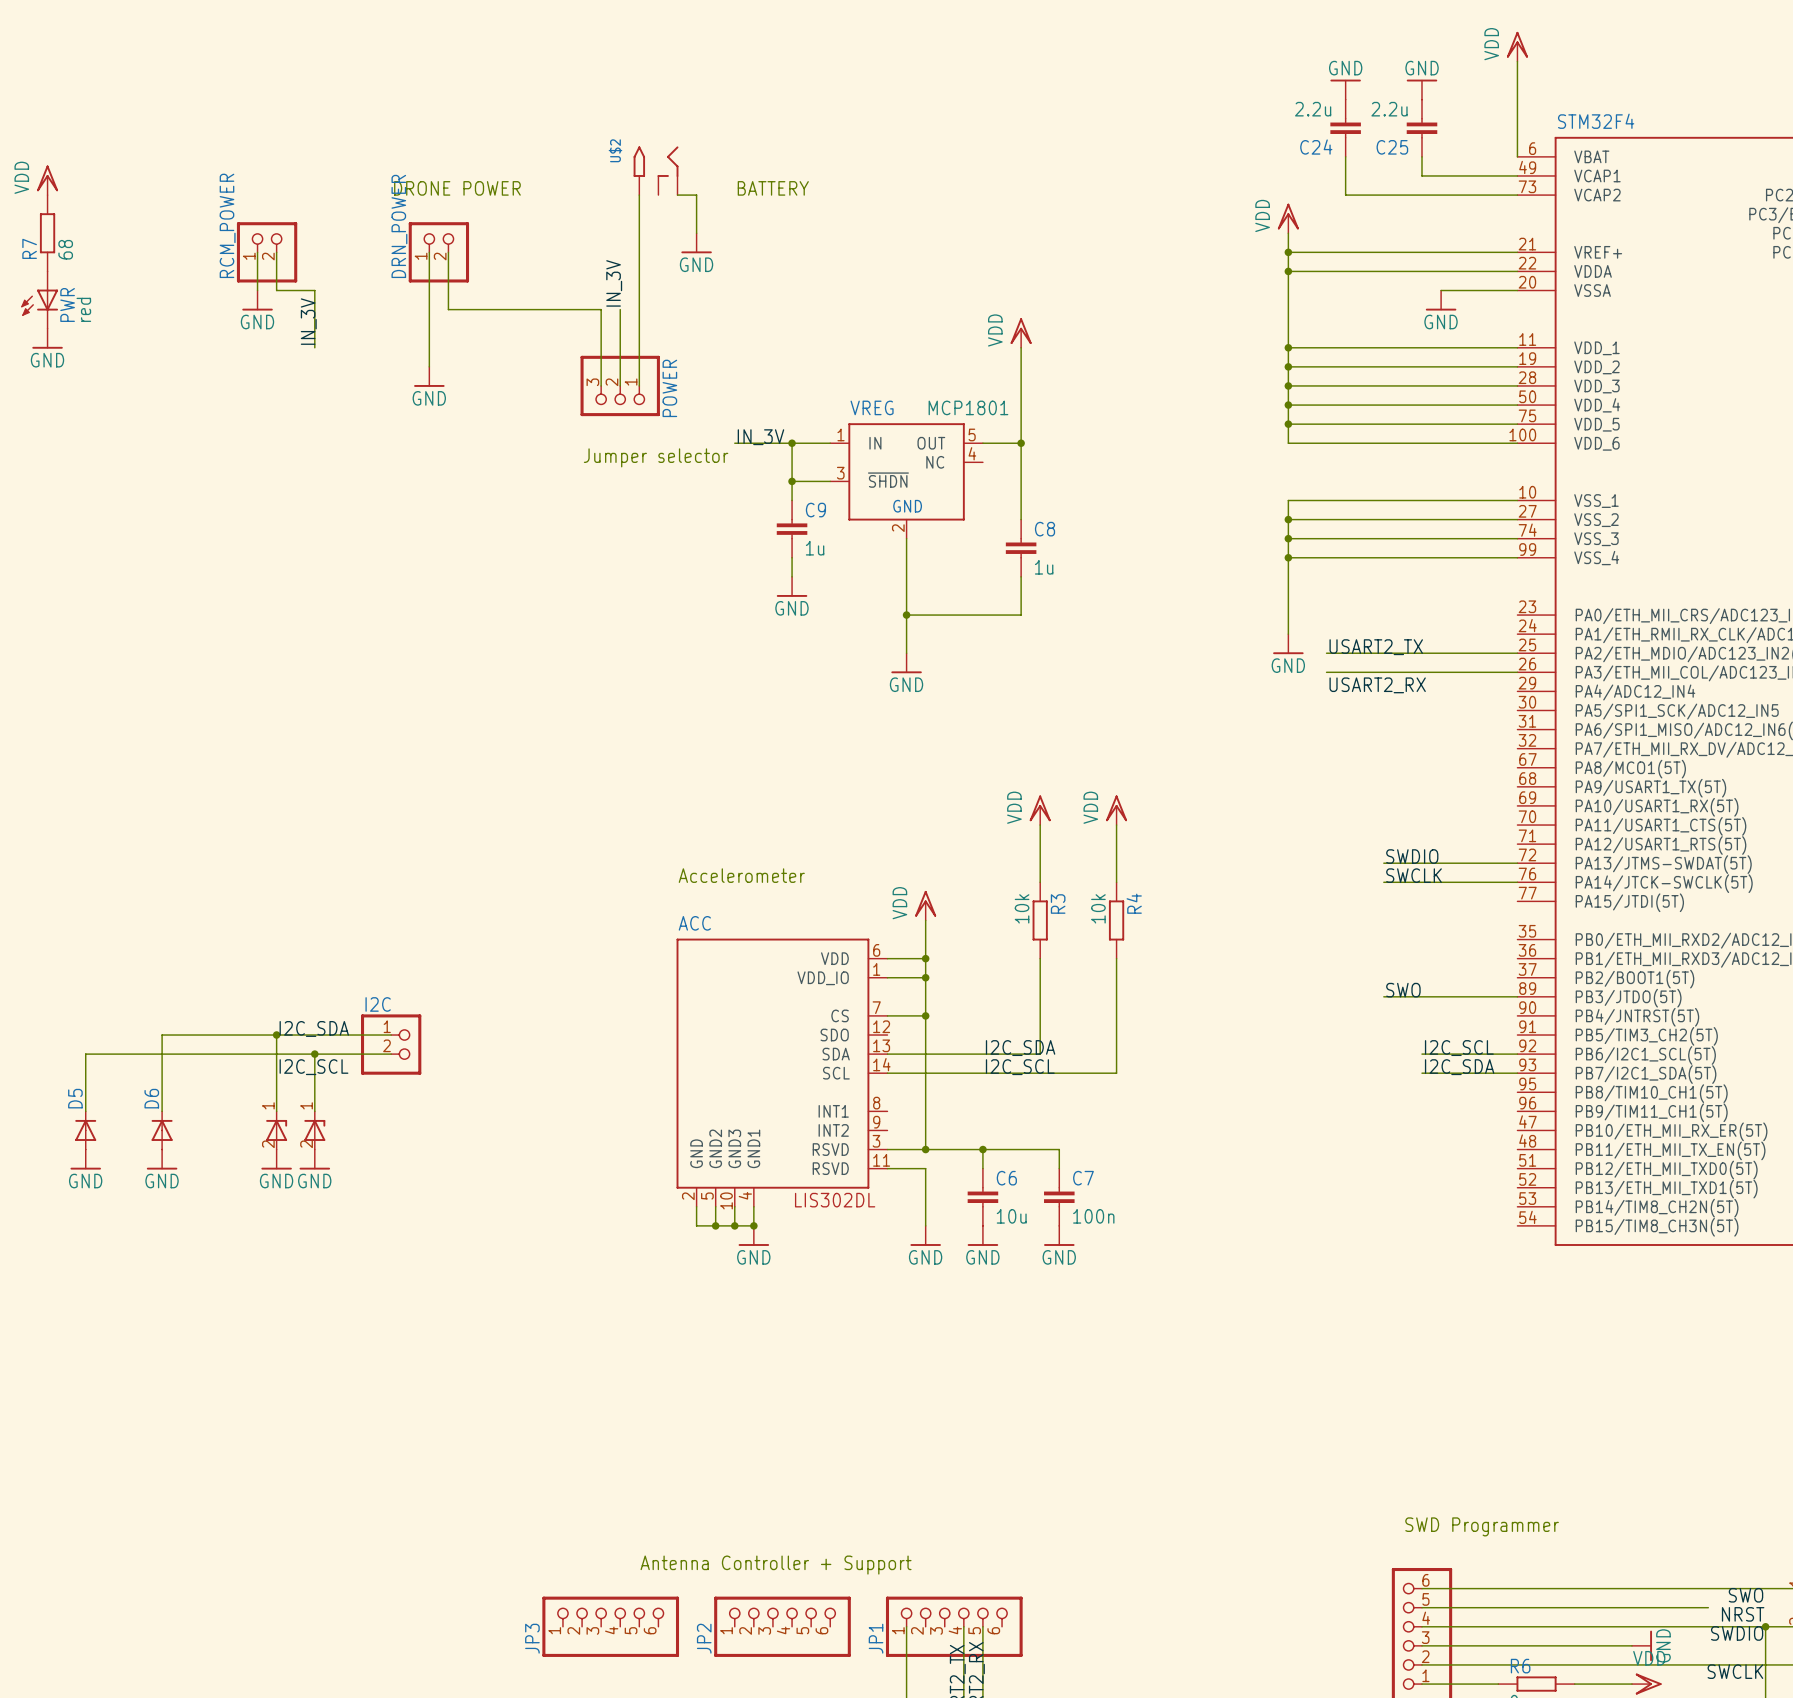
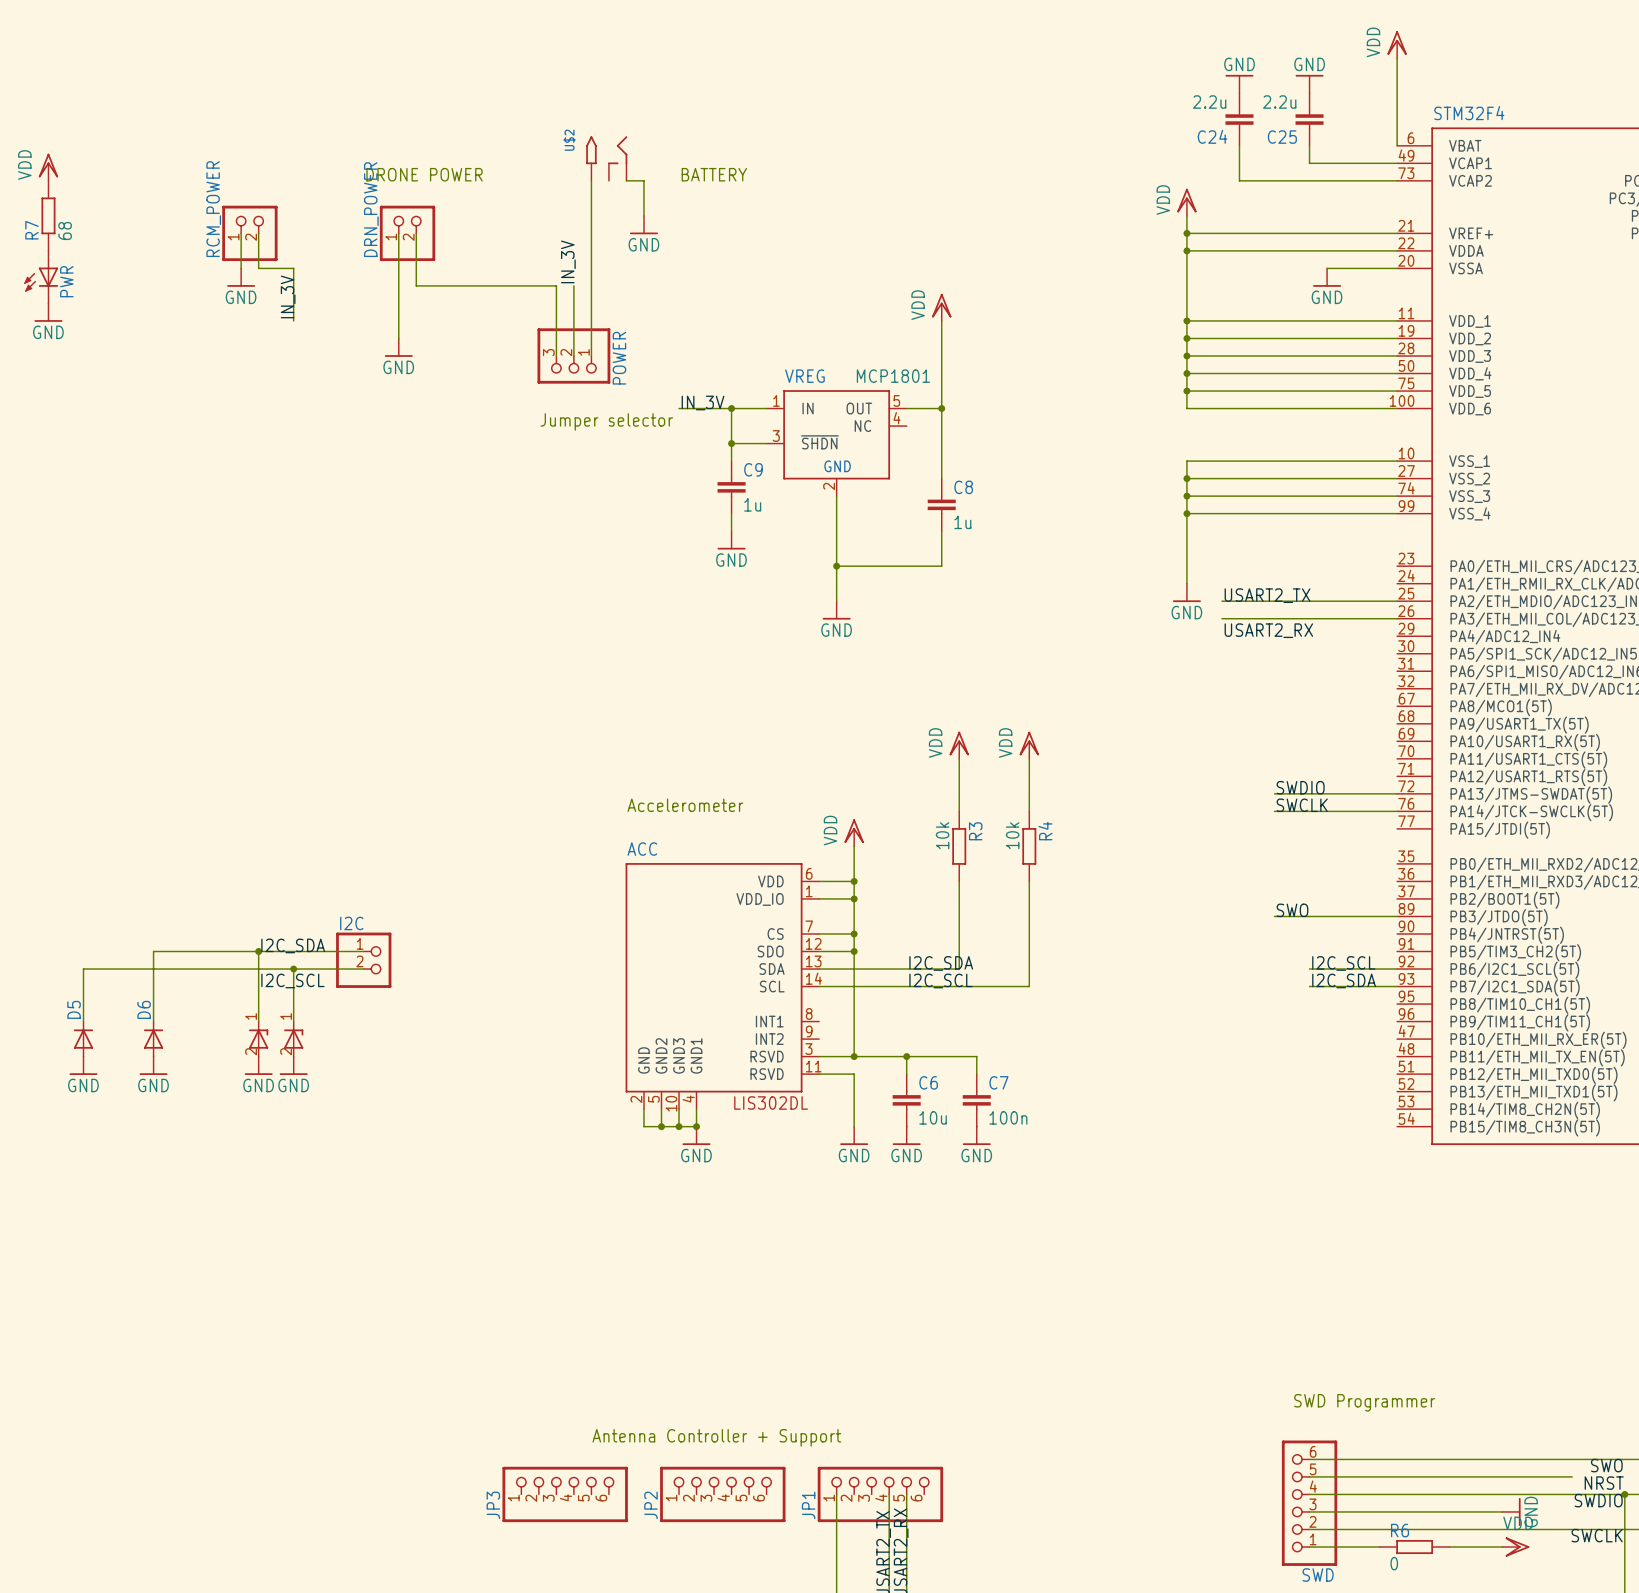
PWR value: red (83, 309) -> none
wire: none -> (819, 951) (854, 951)
junction: none -> (854, 951)

